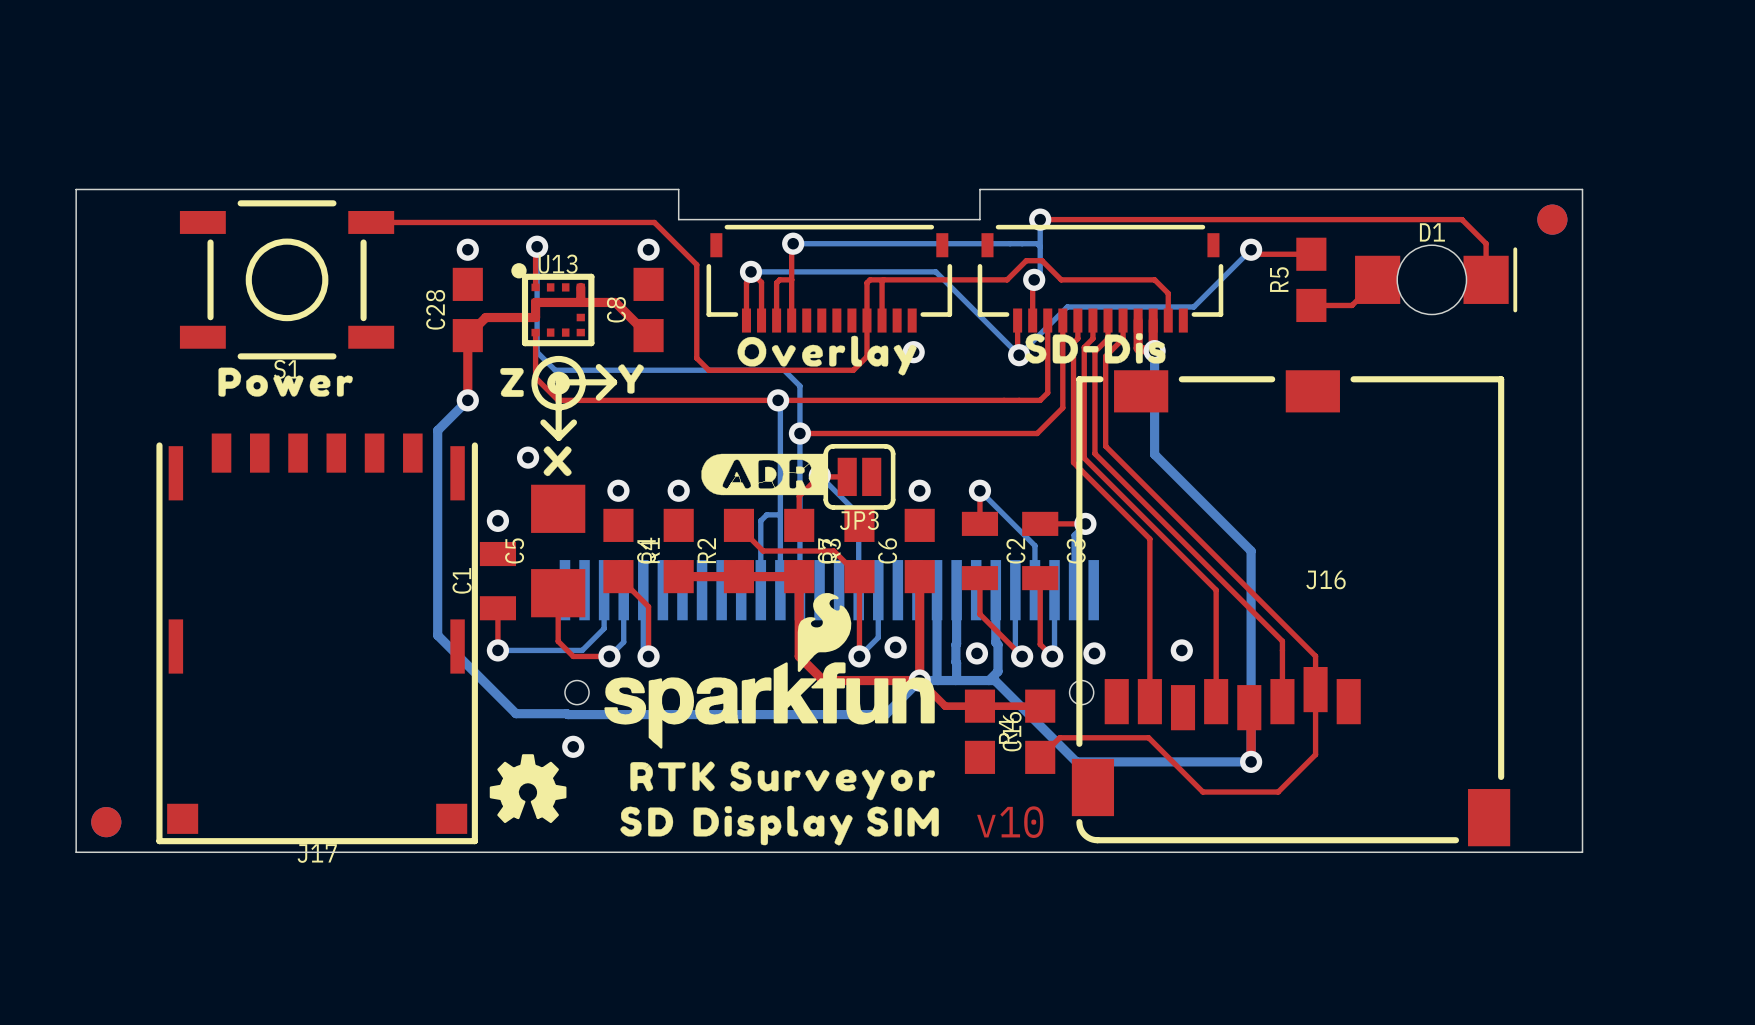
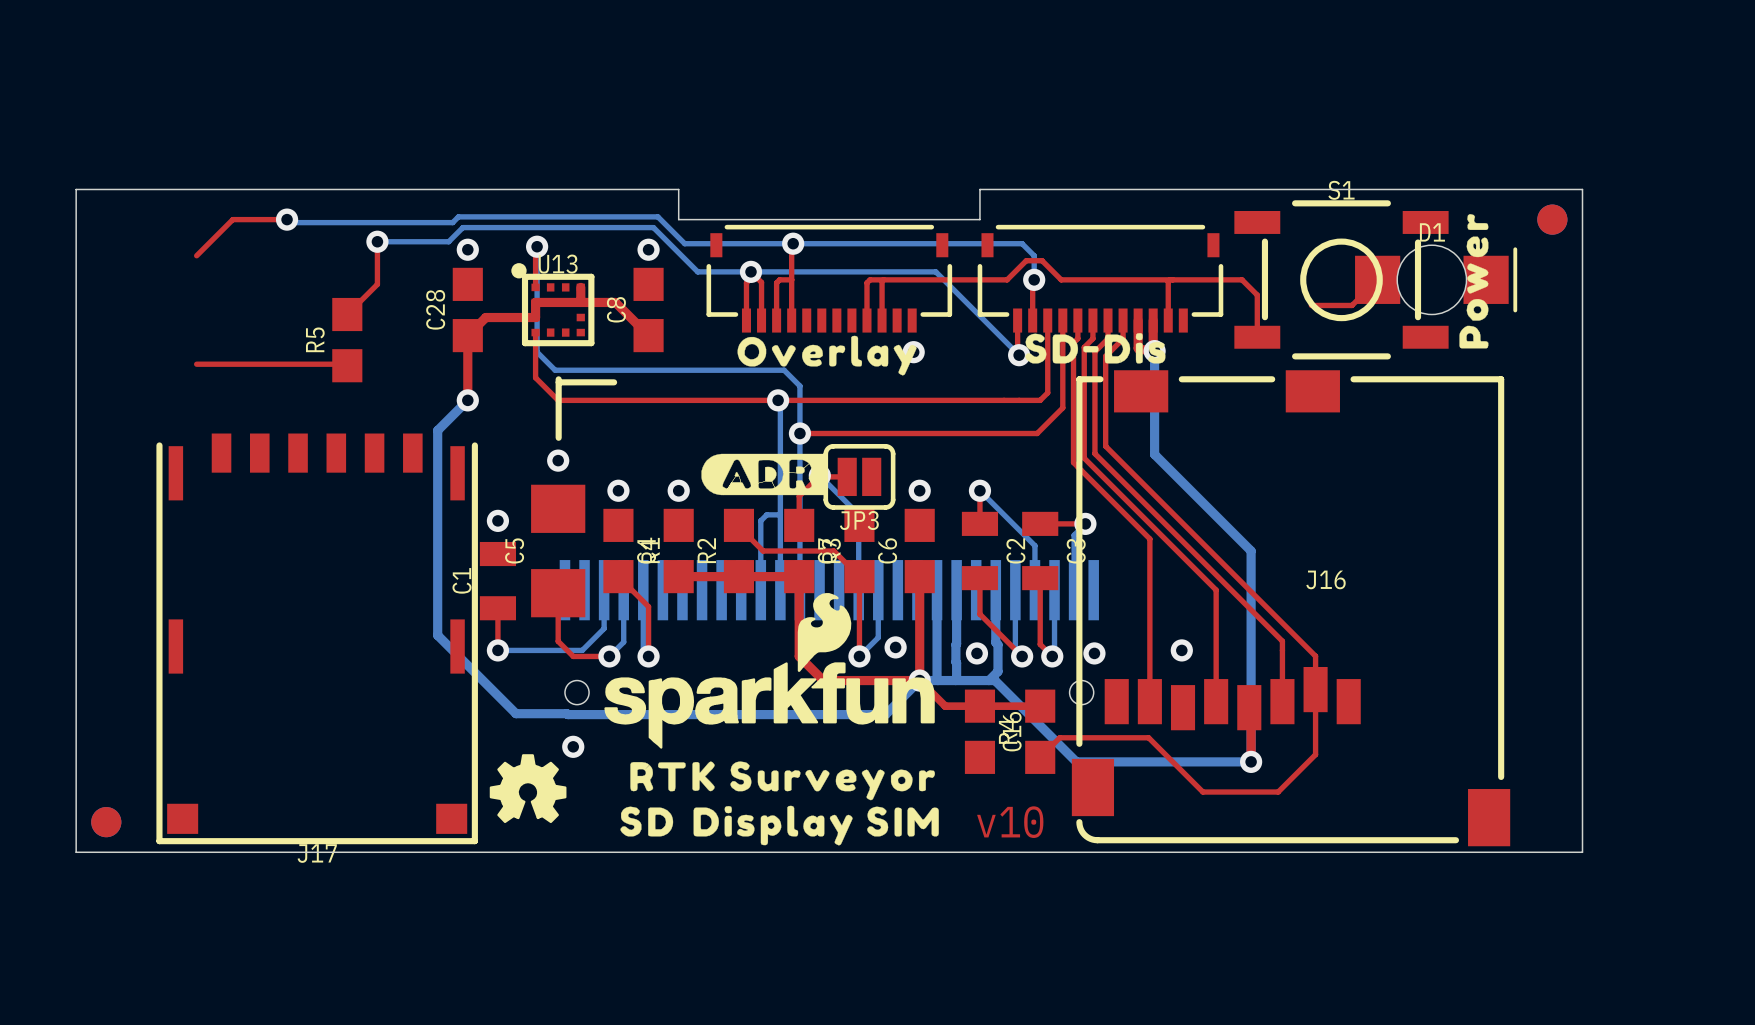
drawing: none -> [1459, 214, 1489, 349]
bottom track: none -> (287, 219) (290, 222) (452, 222) (458, 216) (657, 216) (684, 243) (793, 243)
top track: none -> (287, 219) (232, 219) (196, 255)
via: none -> (287, 219)
bottom track: (1040, 219) (1040, 273) (1034, 279) -> (1022, 243) (1034, 255) (1034, 279)
top track: (1040, 219) (1461, 219) (1486, 243) (1486, 279) -> none
via: (1040, 219) -> none
top track: (371, 222) (654, 222) (696, 264) (696, 358) (708, 370) (853, 370) (866, 356) (866, 320) -> none
bottom track: none -> (377, 241) (448, 241) (462, 227) (653, 227) (697, 271) (751, 271)
top track: none -> (377, 241) (377, 284) (347, 314)
via: none -> (377, 241)
bottom track: (1022, 243) (1037, 243) (1040, 246) -> none
bottom track: (1251, 249) (1193, 306) (1067, 306) (1019, 355) -> none
top track: (1251, 249) (1255, 254) (1311, 254) -> none
via: (1251, 249) -> none
S1 rotation: 0° (287, 279) -> 180° (1341, 279)
S1 position: (287, 279) -> (1341, 279)
top track: (1154, 279) (1168, 293) -> (1169, 279) (1168, 293)
top track: none -> (1154, 279) (1242, 279) (1257, 295) (1257, 337)
R5 position: (1311, 279) -> (347, 340)
drawing: [500, 355, 644, 477] -> none
top track: none -> (196, 364) (347, 365)
drawing: [218, 367, 353, 397] -> none
line: (598, 367) (614, 382) (598, 397) -> none
line: (543, 422) (558, 437) (573, 422) -> none
via position: (528, 457) -> (558, 460)

